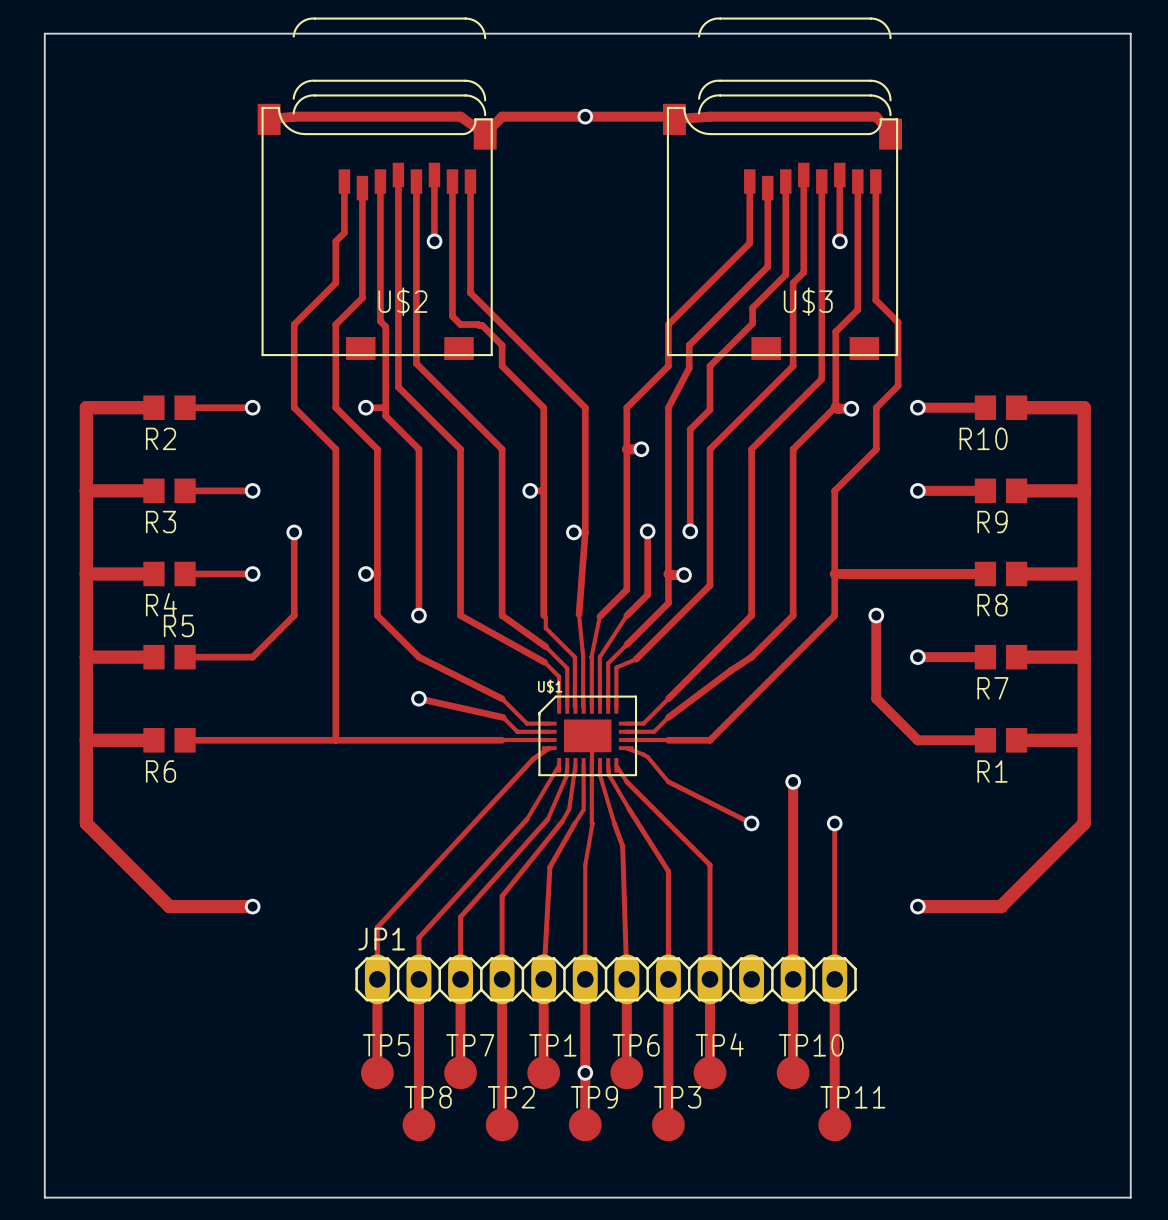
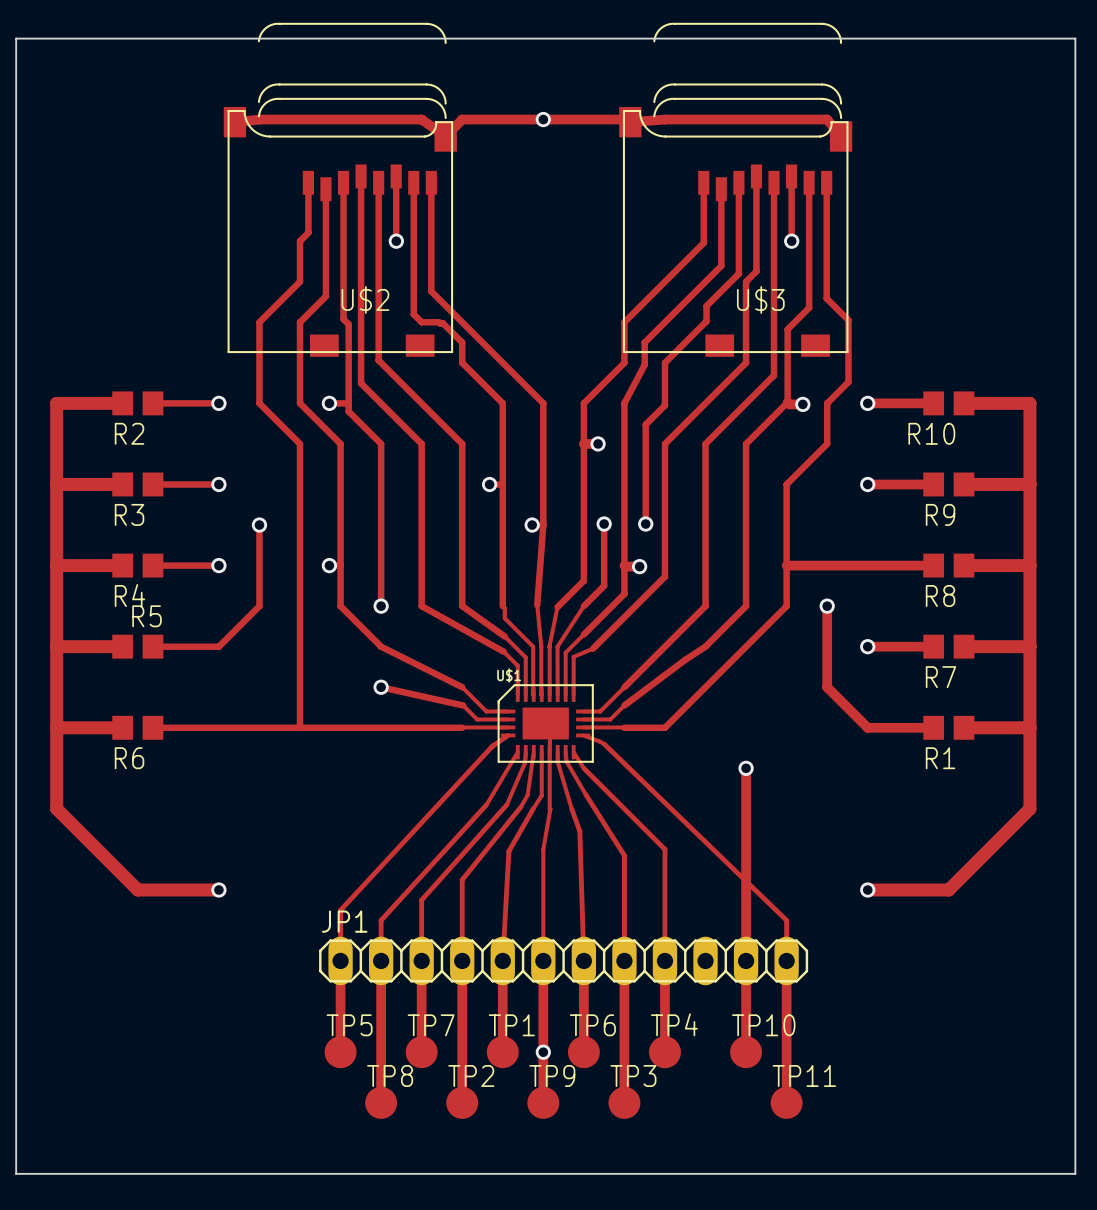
track: (647, 756) (668, 781) (751, 823) -> (604, 744) (786, 920)
via: (751, 823) -> none
track: (834, 823) (834, 937) -> none
via: (834, 823) -> none

